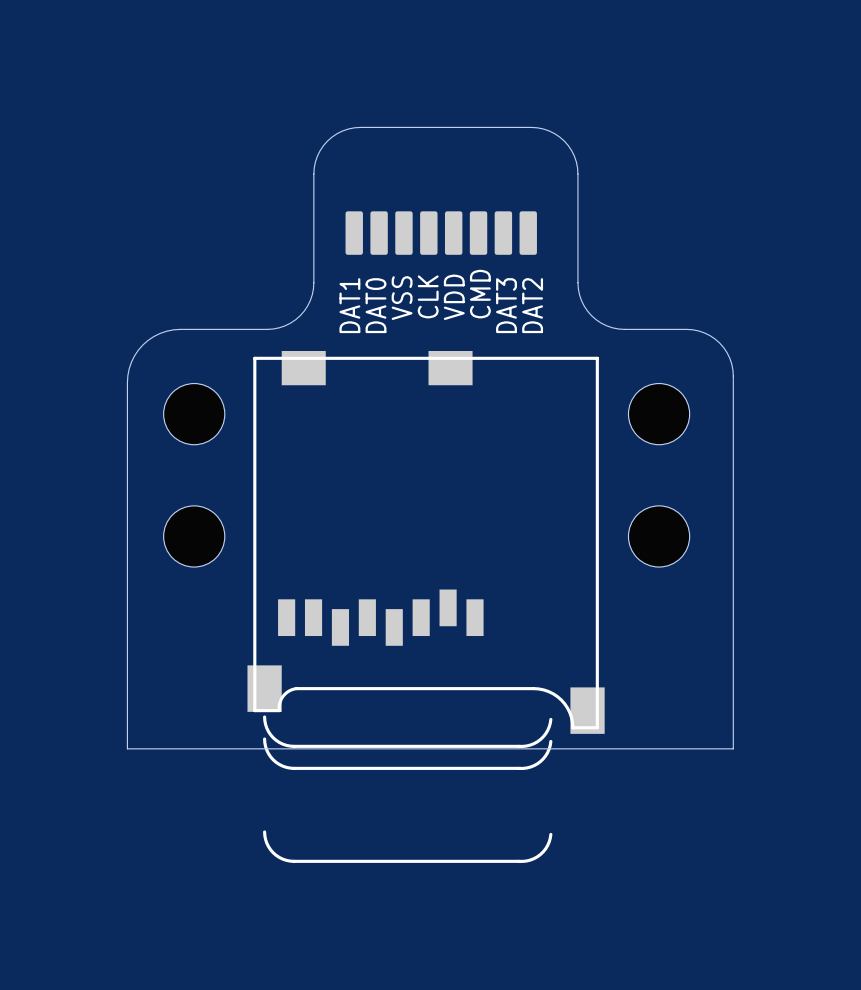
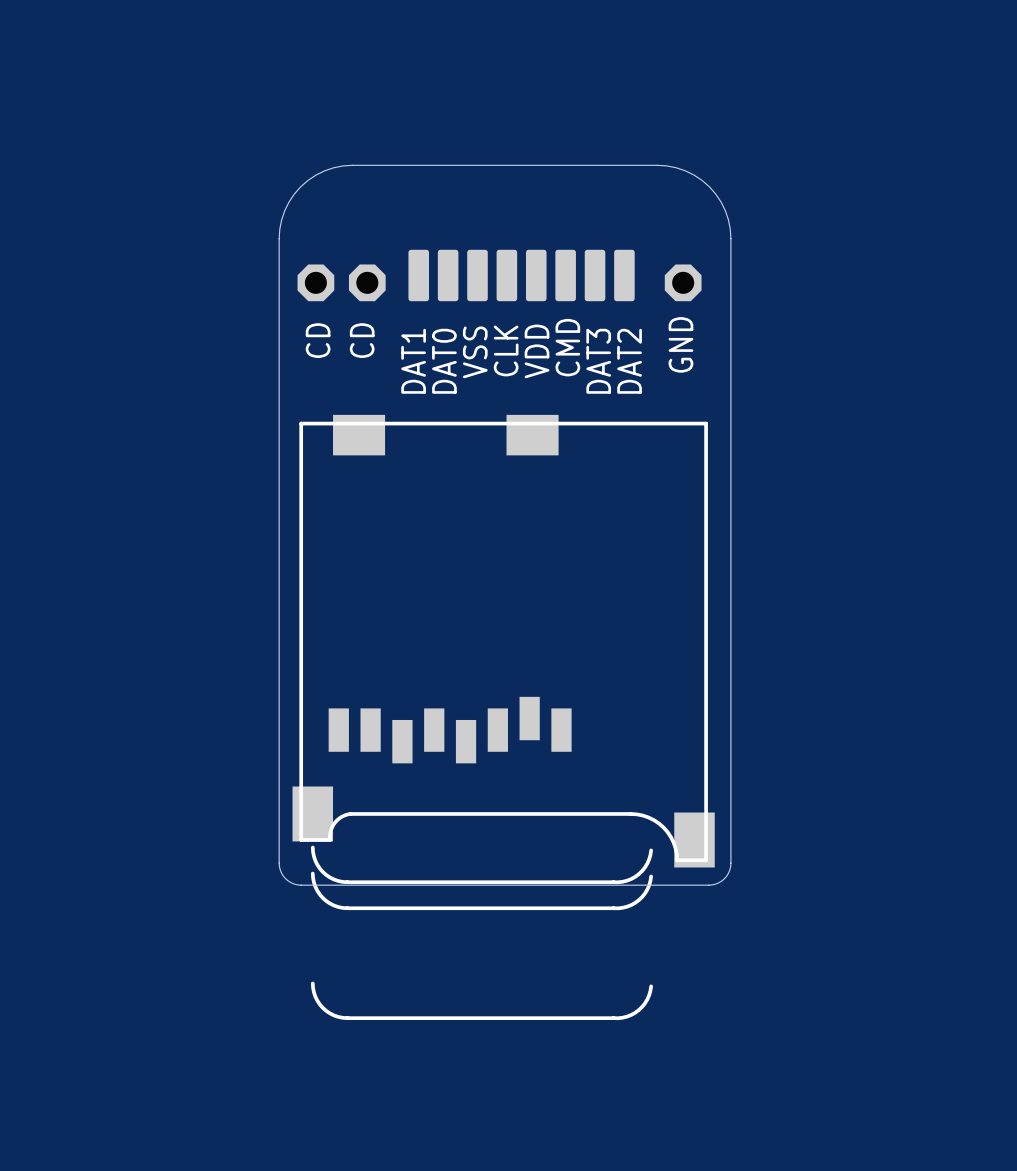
part: none -> (315, 282)
part: none -> (367, 282)
part: none -> (683, 282)
text: none -> CD (318, 340)
text: none -> CD (362, 340)
text: none -> GND (680, 344)
hole: (194, 414) -> none
hole: (659, 414) -> none
hole: (194, 536) -> none
hole: (659, 536) -> none
board edge: (254, 748) (127, 748) (127, 375) (131, 362) (138, 350) (148, 340) (160, 333) (180, 329) (273, 328) (290, 323) (300, 315) (307, 306) (313, 288) (315, 161) (320, 150) (332, 137) (348, 129) (360, 127) (531, 127) (543, 129) (554, 133) (564, 141) (571, 150) (577, 167) (578, 288) (581, 300) (587, 311) (601, 323) (618, 328) (698, 330) (715, 339) (723, 347) (729, 358) (733, 375) (733, 748) (599, 748) -> (301, 885) (292, 883) (285, 878) (280, 871) (279, 863) (279, 229) (284, 210) (300, 186) (324, 170) (352, 165) (667, 165) (685, 170) (702, 180) (721, 202) (728, 219) (730, 238) (730, 863) (729, 871) (724, 878) (717, 883) (708, 885)

